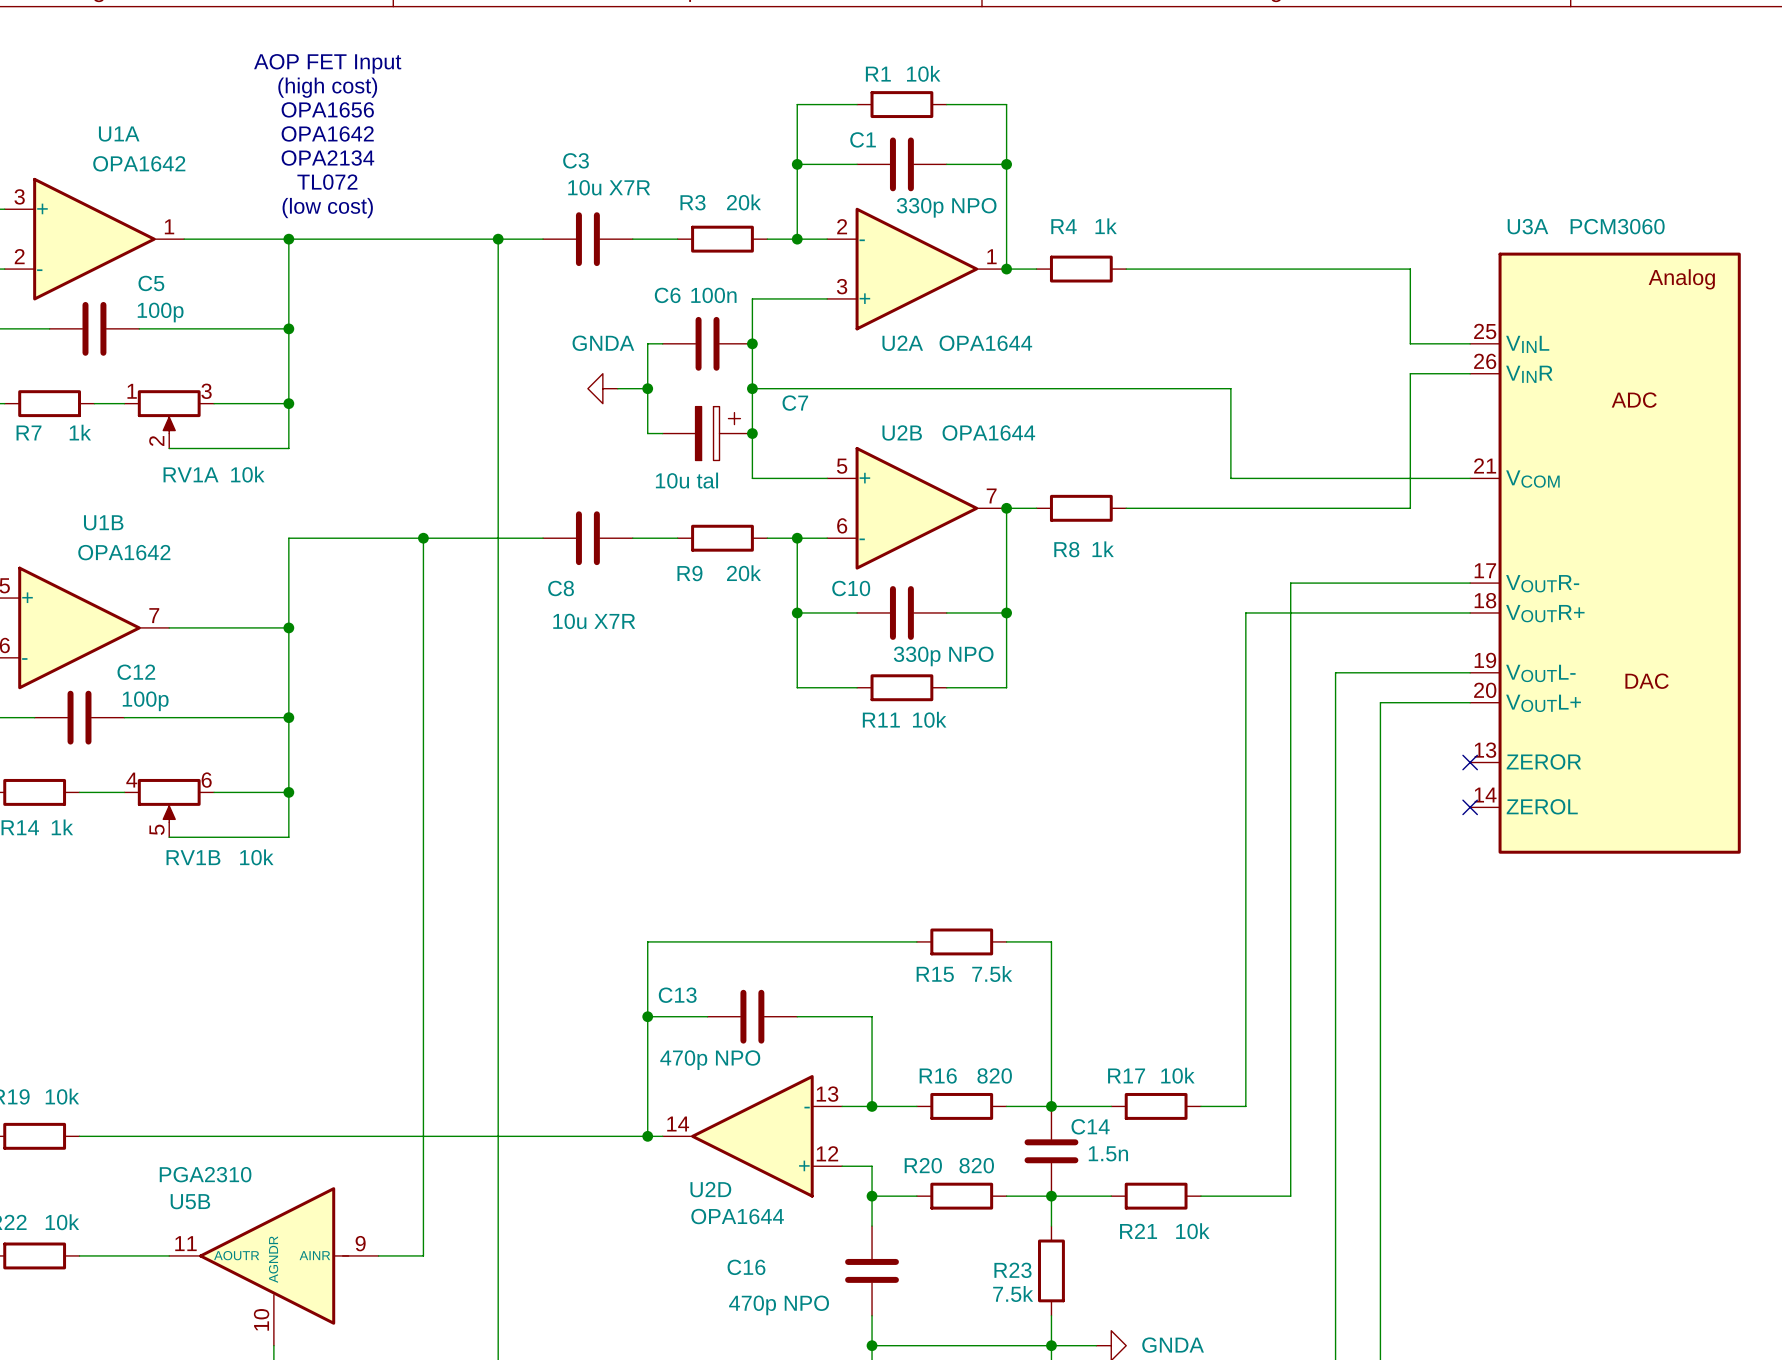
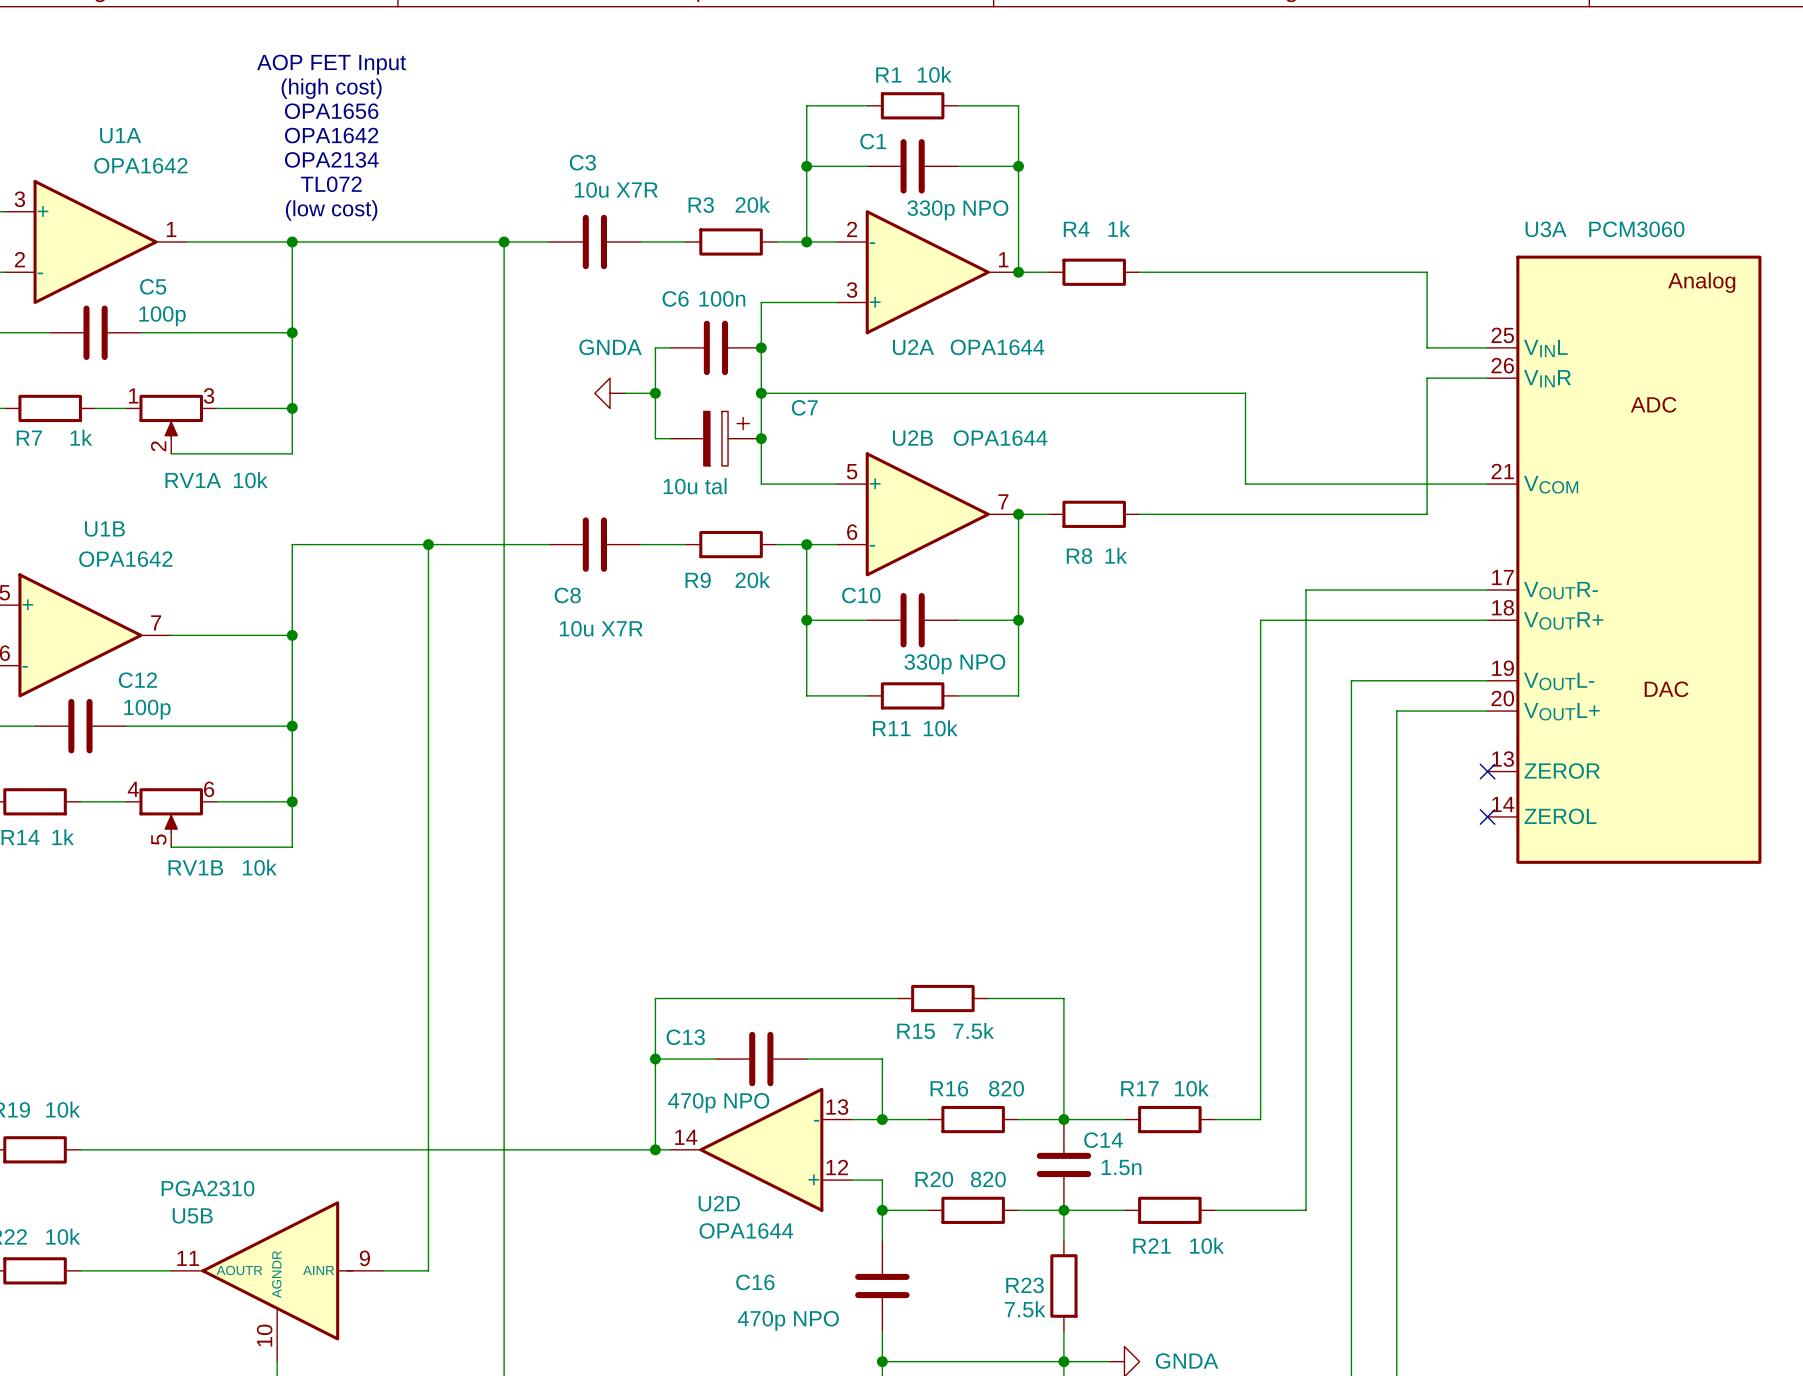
wire: (916, 941) (647, 941) (647, 986) -> (897, 998) (655, 998)
R15 position: (961, 941) -> (942, 998)
wire: (1006, 941) (1051, 941) (1051, 986) -> (988, 998) (1063, 998)
wire: (647, 1016) (707, 1016) -> (655, 1059) (715, 1059)
junction position: (647, 1016) -> (655, 1059)
C13 position: (752, 1016) -> (761, 1059)
wire: (797, 1016) (872, 1016) (872, 1046) -> (806, 1059) (882, 1059)

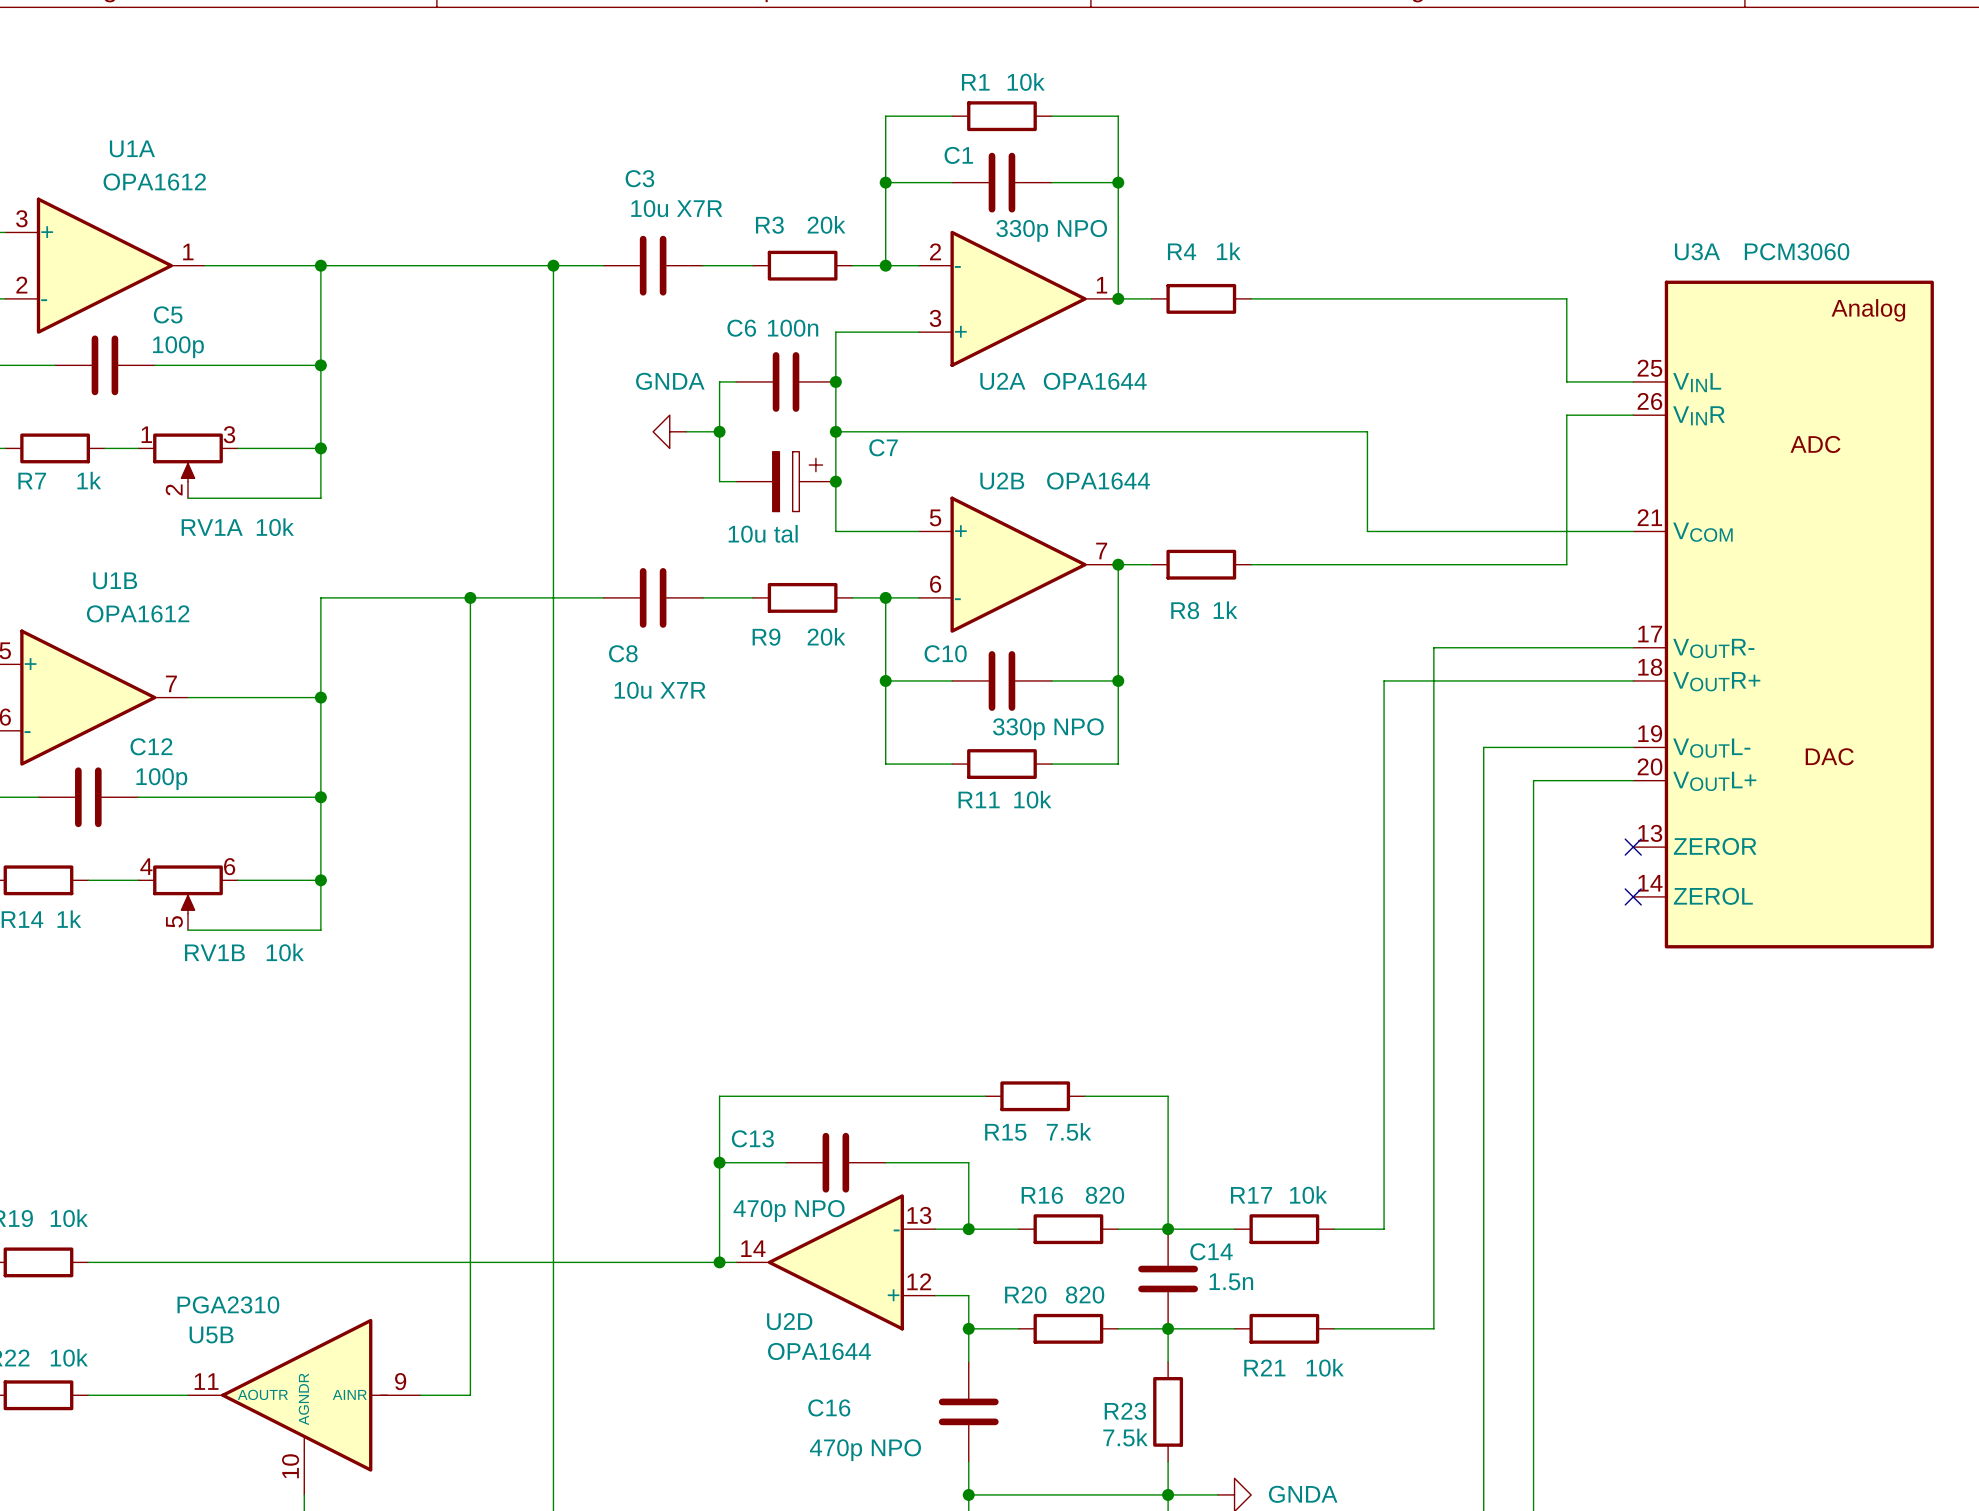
text: AOP FET Input (331, 64) -> none
text: (high cost) (331, 88) -> none
text: OPA1656 (331, 111) -> none
text: OPA1642 (331, 135) -> none
text: OPA2134 (331, 159) -> none
U1A value: OPA1642 (140, 165) -> OPA1612 (154, 182)
text: TL072 (331, 184) -> none
text: (low cost) (331, 210) -> none
U1B value: OPA1642 (125, 559) -> OPA1612 (138, 613)

